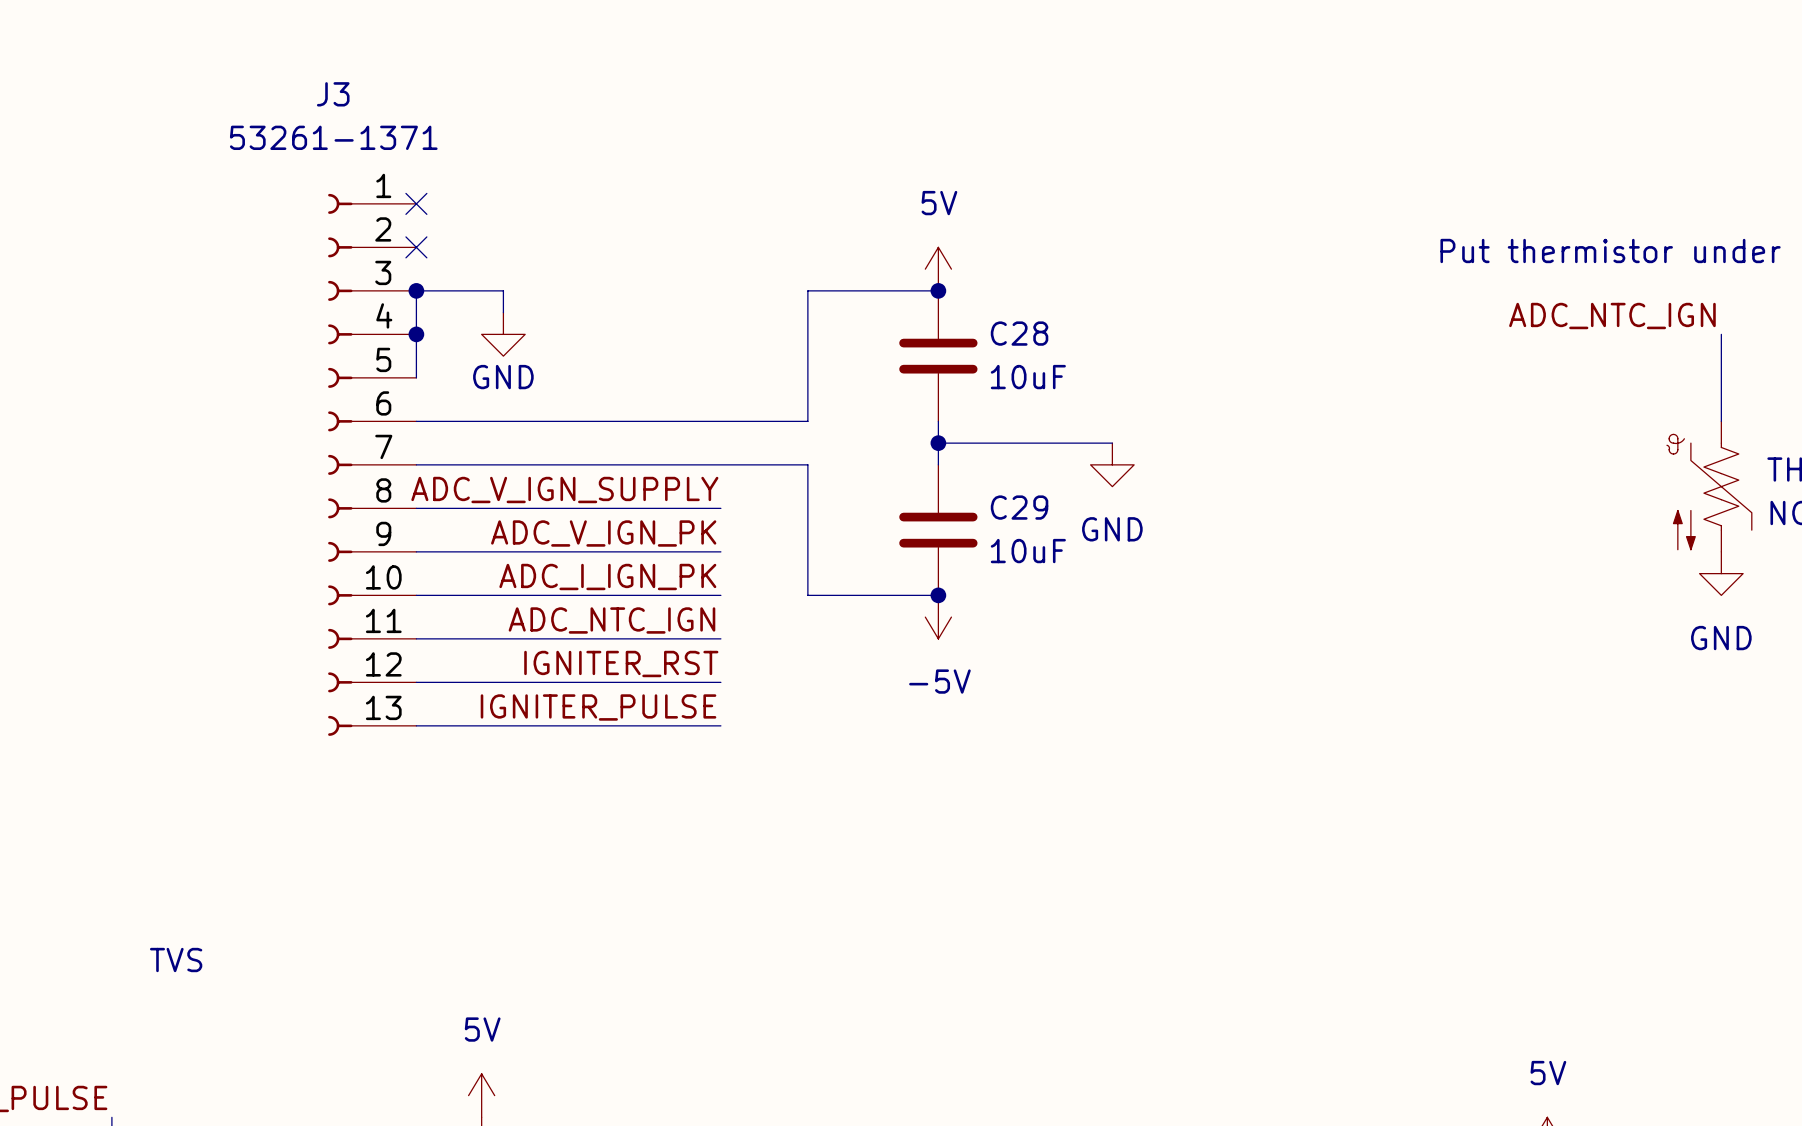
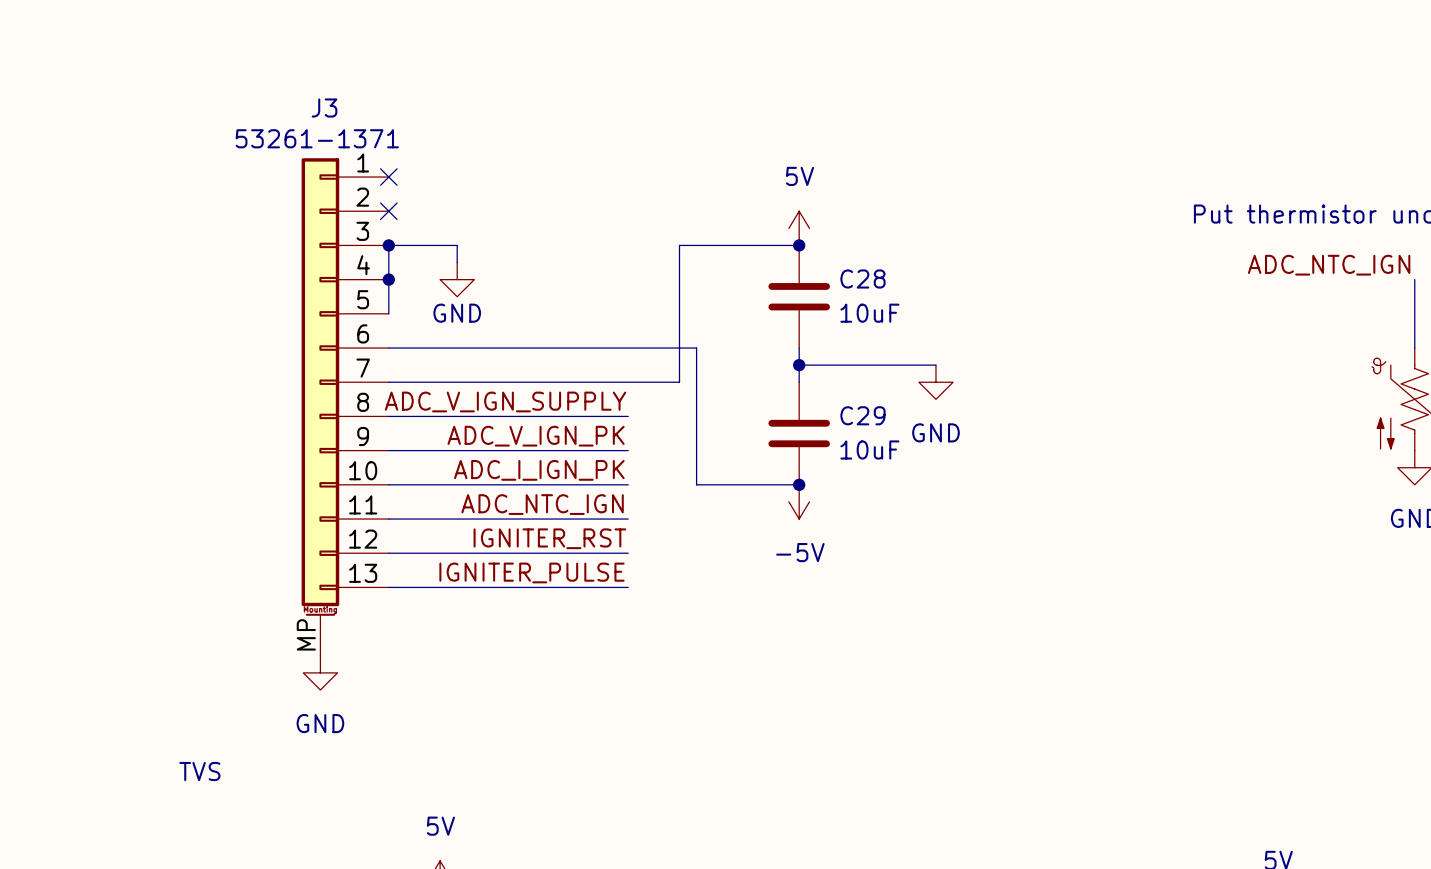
J3 symbol: [328, 193, 417, 736] -> [301, 158, 389, 656]
wire: (807, 290) (807, 421) -> (696, 245) (679, 245) (679, 382)
wire: (786, 464) (807, 464) -> (696, 348) (696, 382)
power symbol: none -> GND (320, 672)

